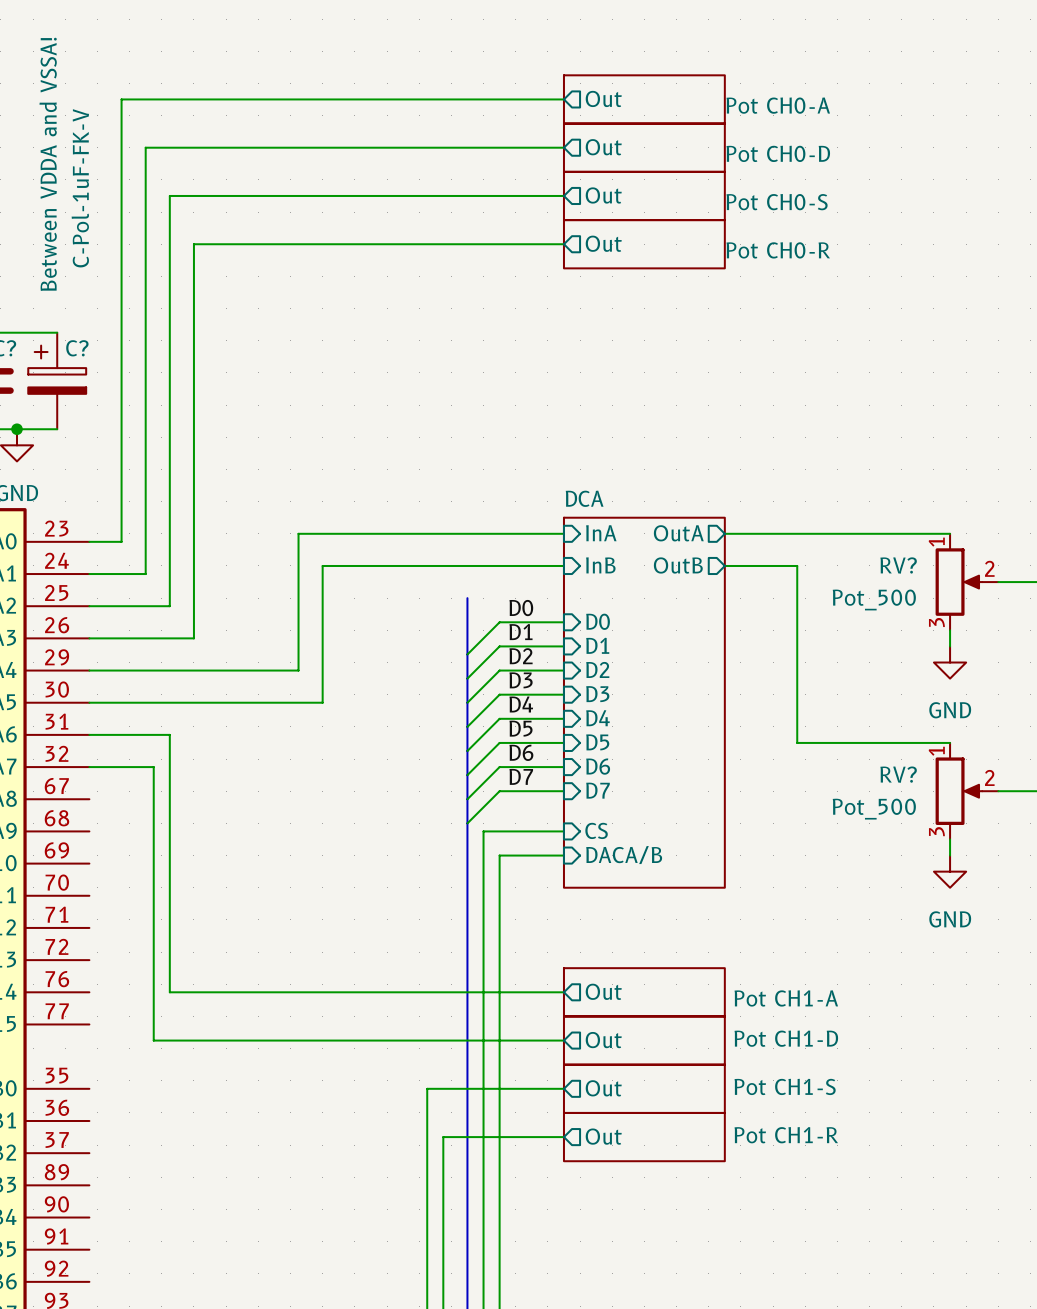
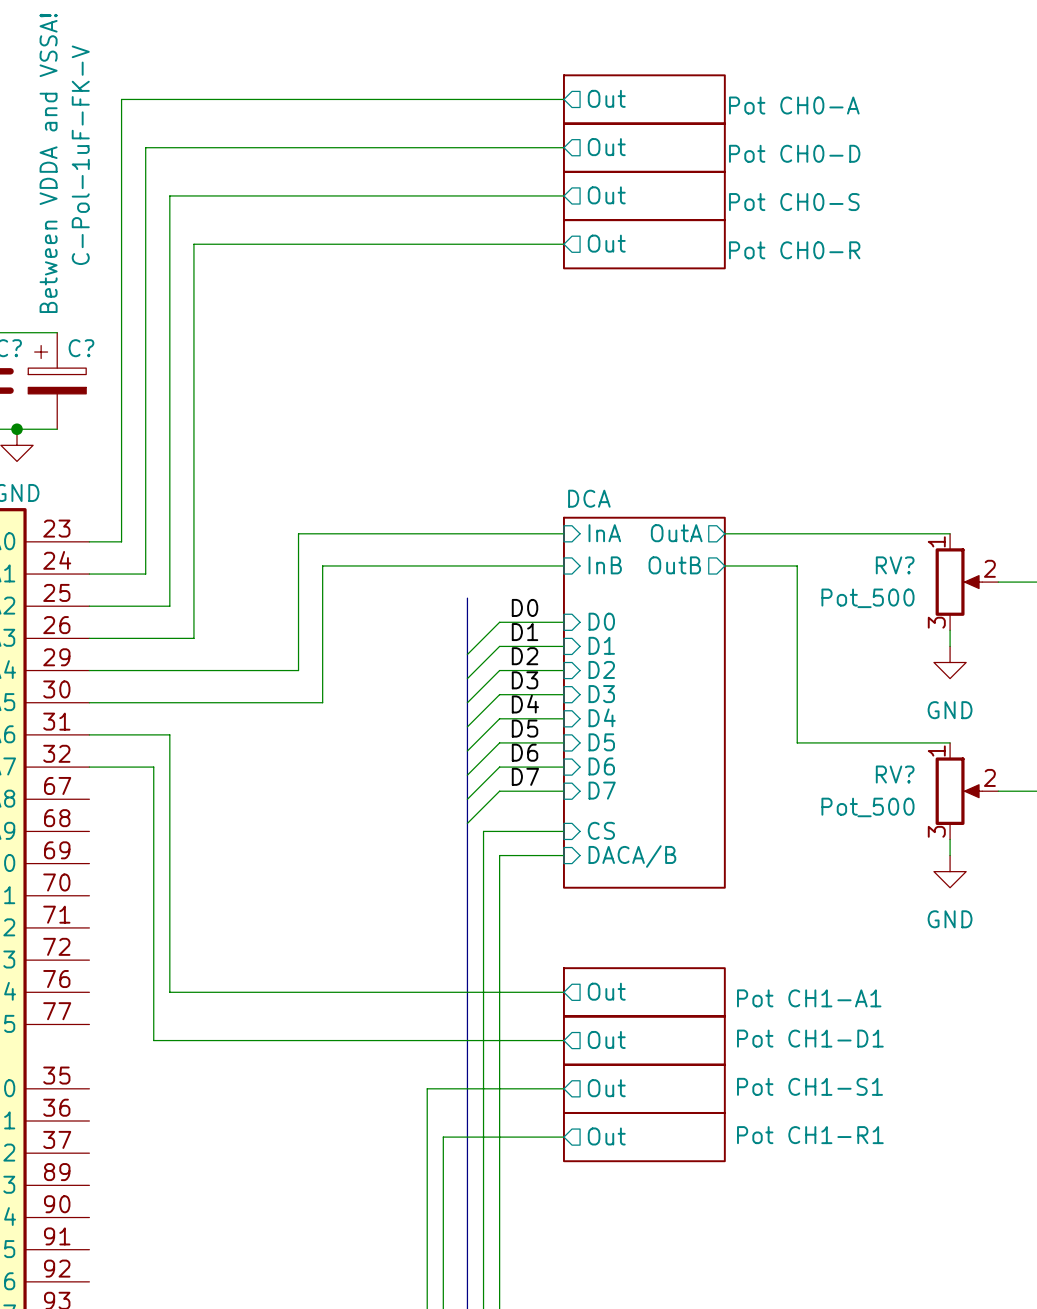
sheet Pot CH1-A name: Pot CH1-A (786, 998) -> Pot CH1-A1 (809, 998)
sheet Pot CH1-D name: Pot CH1-D (786, 1038) -> Pot CH1-D1 (810, 1038)
sheet Pot CH1-S name: Pot CH1-S (785, 1086) -> Pot CH1-S1 (810, 1086)
sheet Pot CH1-R name: Pot CH1-R (786, 1135) -> Pot CH1-R1 (810, 1135)

